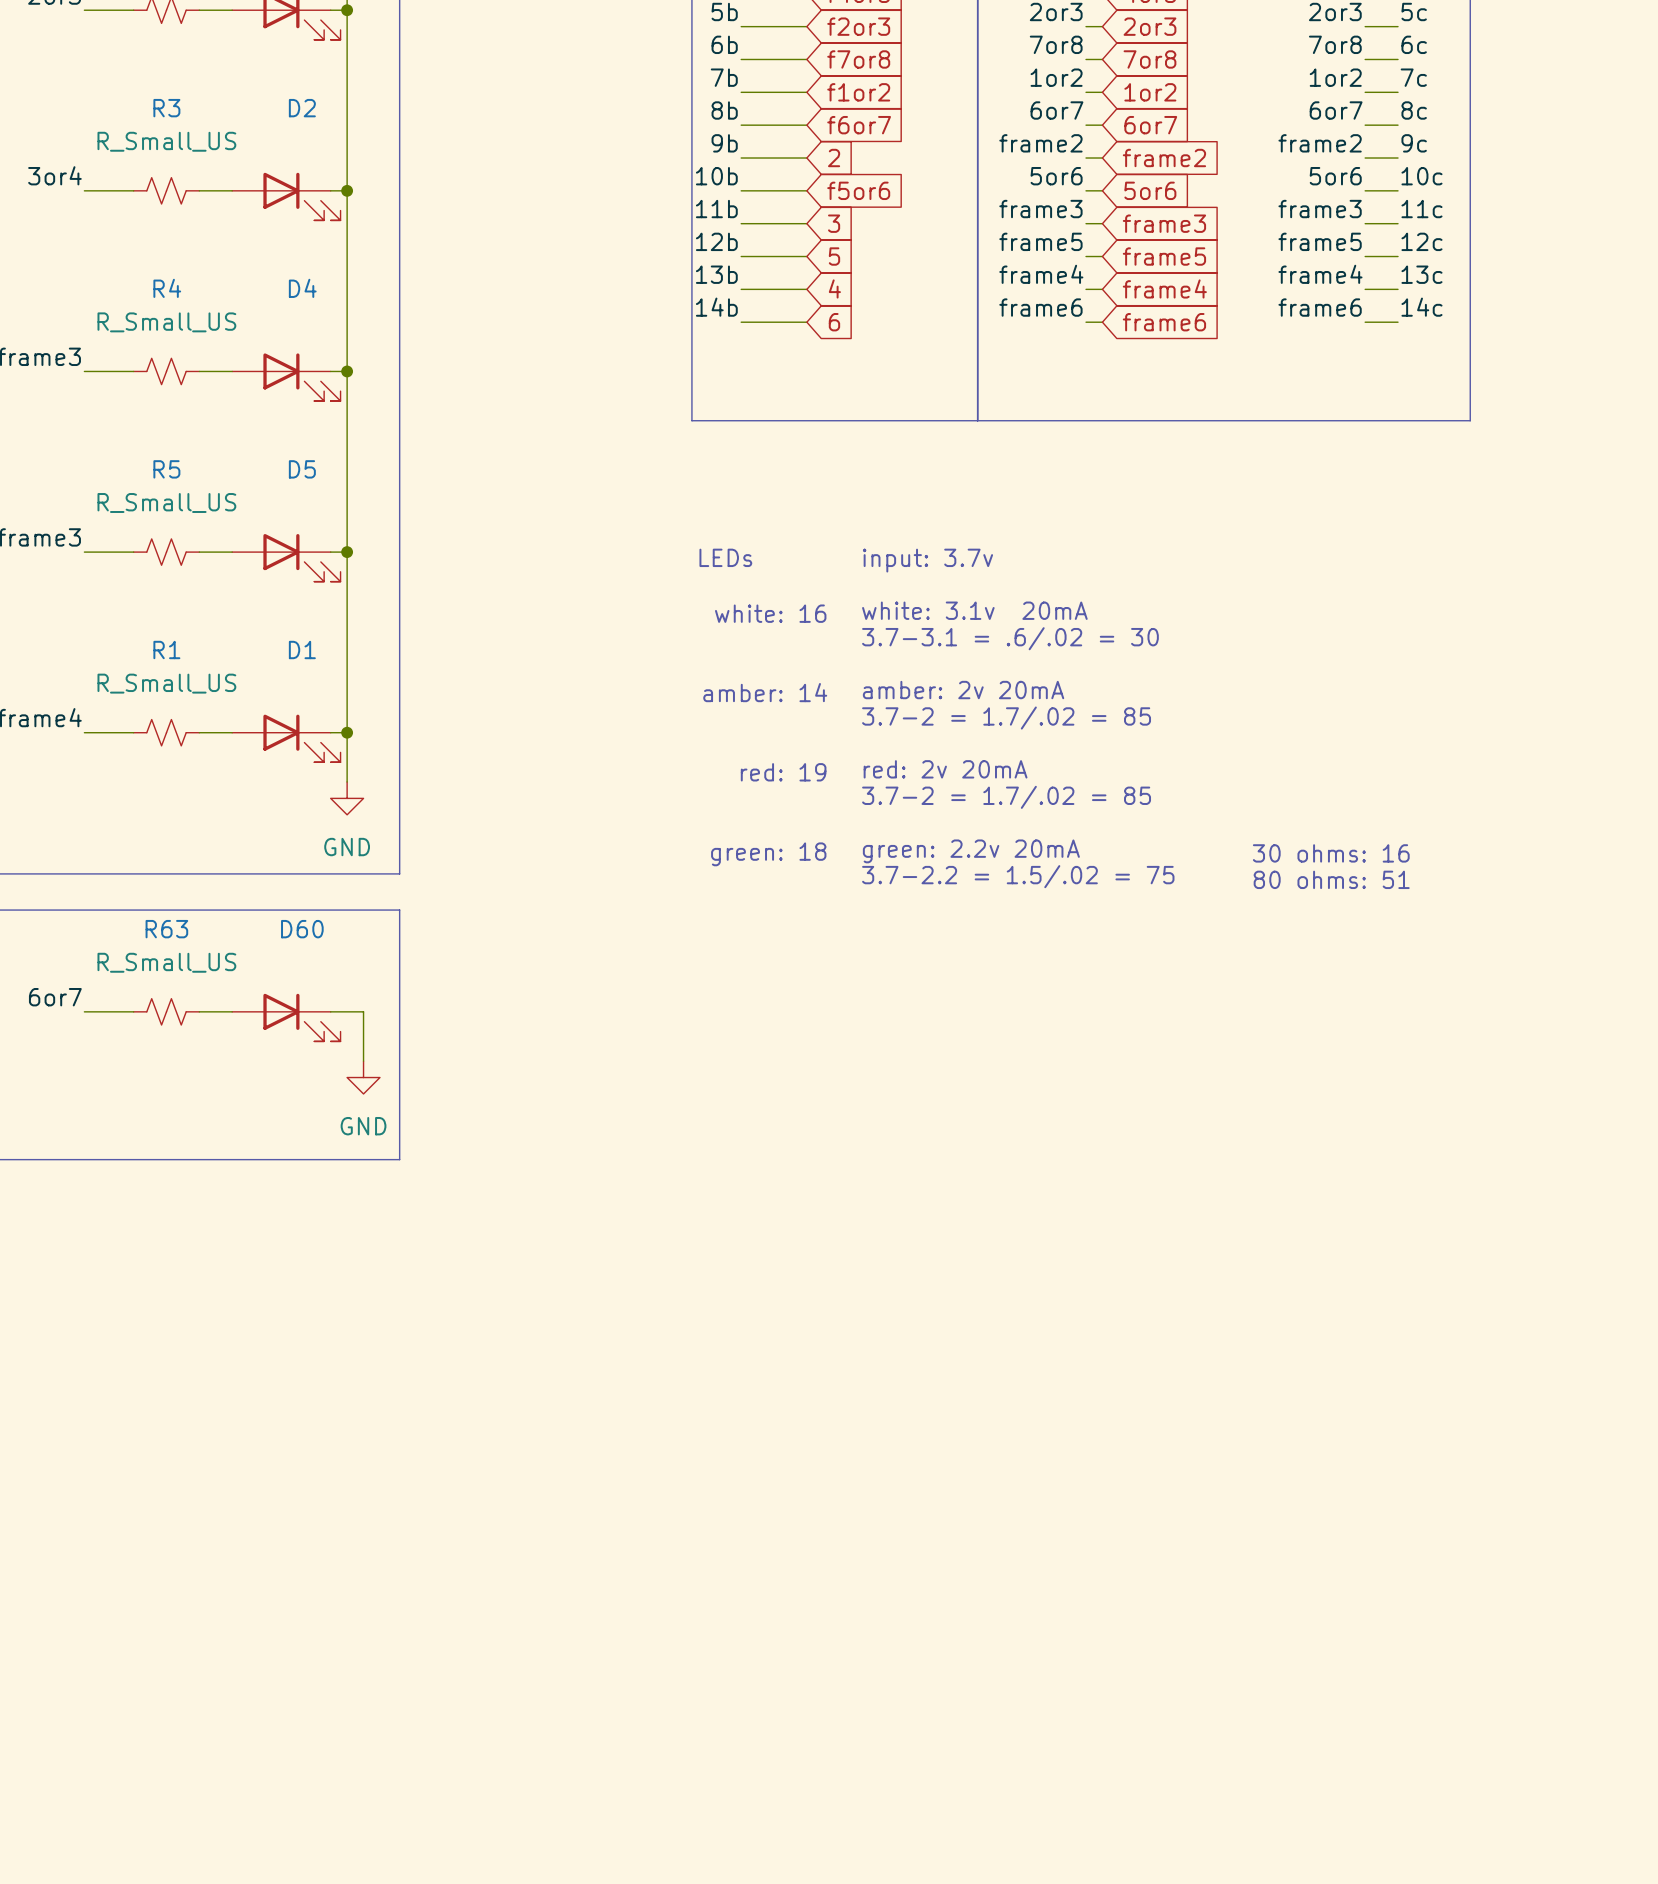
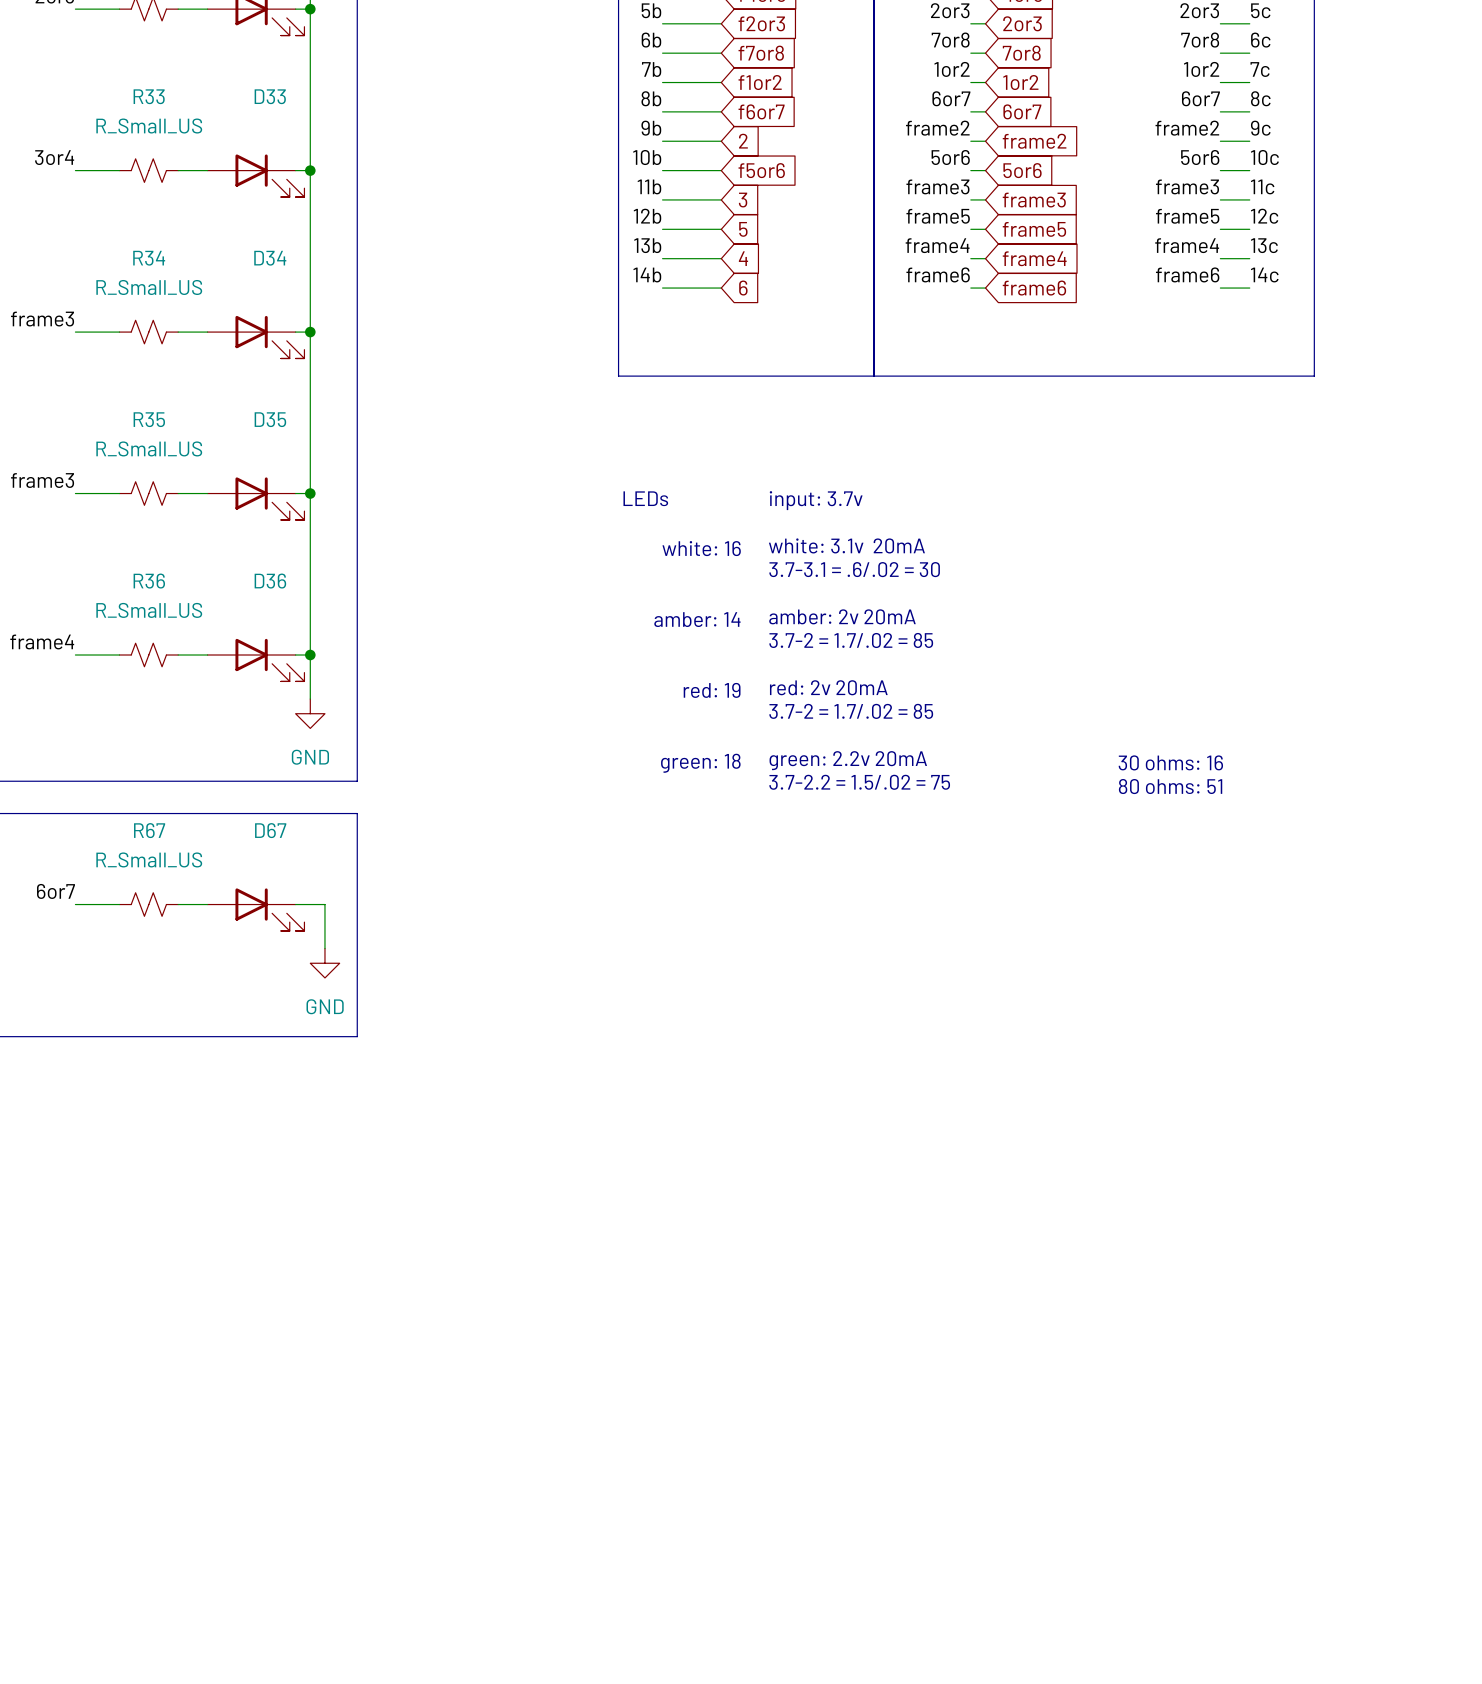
R3 name: R3 (166, 108) -> R33 (149, 96)
D2 name: D2 (302, 108) -> D33 (270, 96)
R4 name: R4 (167, 288) -> R34 (149, 258)
D4 name: D4 (302, 288) -> D34 (270, 258)
R5 name: R5 (166, 469) -> R35 (149, 419)
D5 name: D5 (302, 469) -> D35 (270, 419)
R1 name: R1 (166, 649) -> R36 (149, 581)
D1 name: D1 (302, 649) -> D36 (270, 581)
R63 name: R63 (166, 929) -> R67 (149, 830)
D60 name: D60 (302, 929) -> D67 (270, 830)

